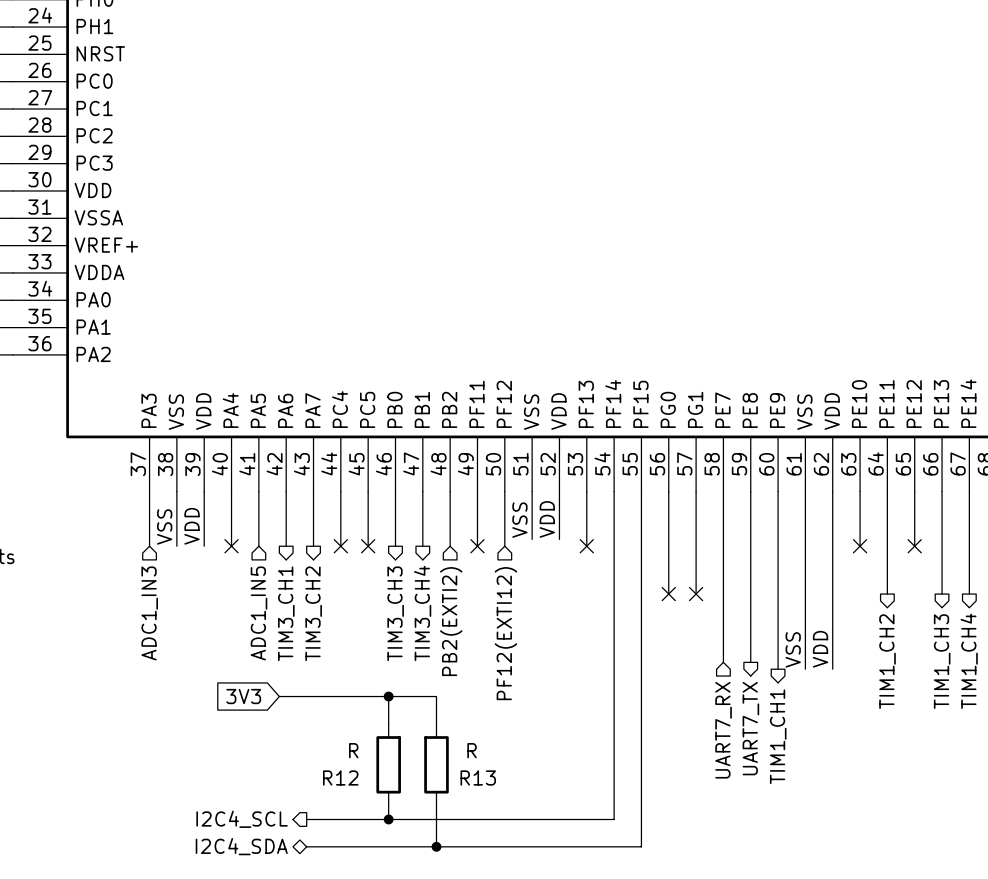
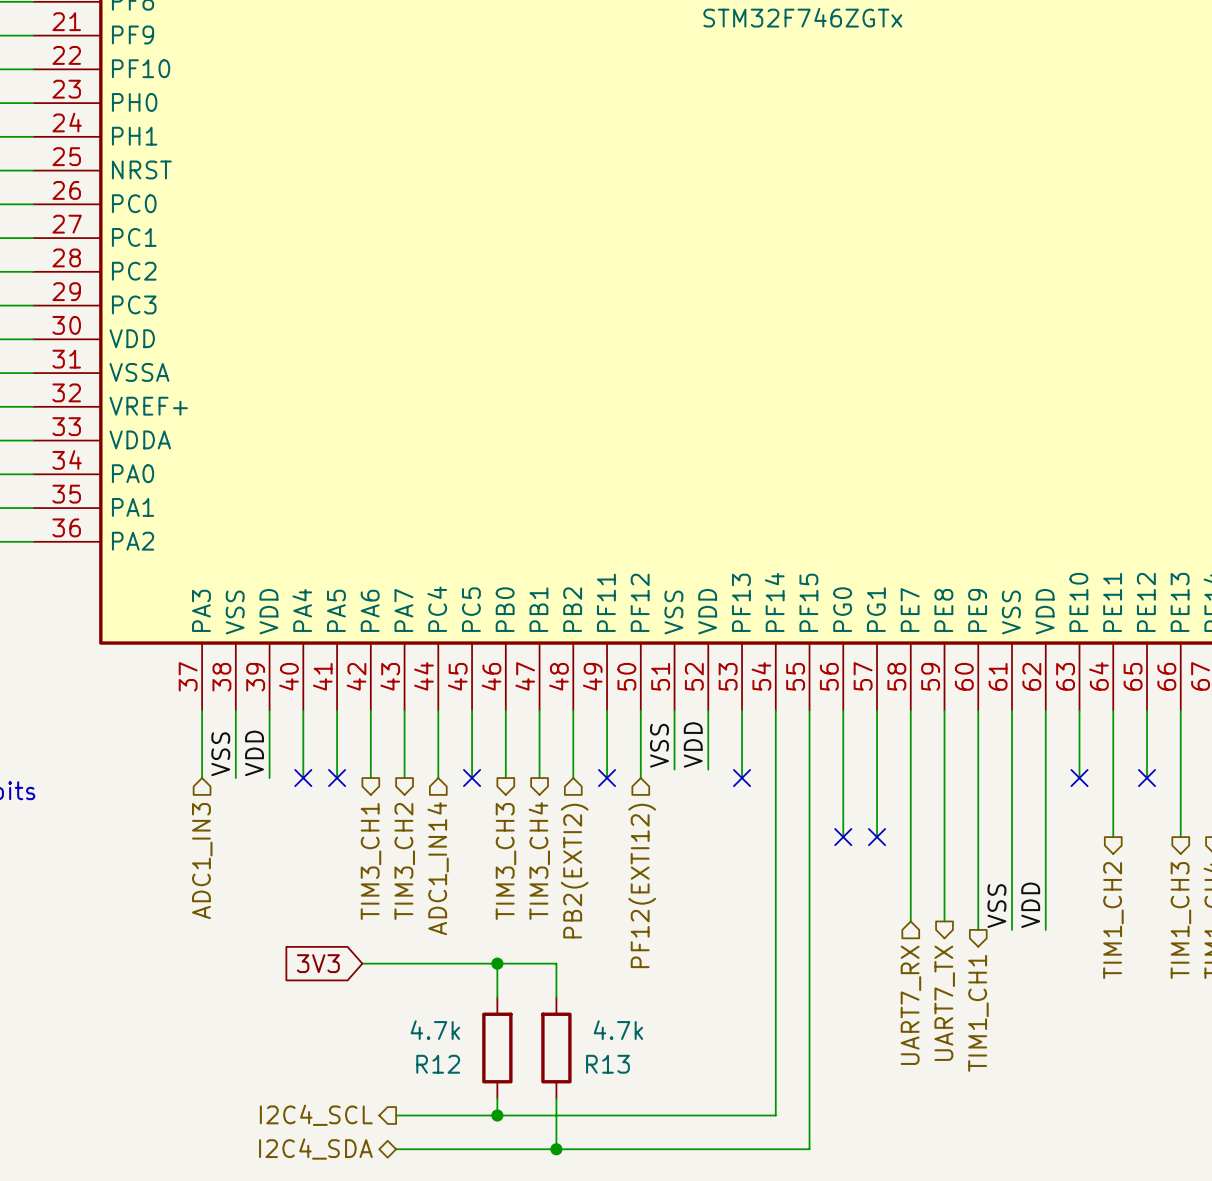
no-connect mark: none -> (337, 778)
no-connect mark: (340, 546) -> none
hierarchical label: ADC1_IN5 (259, 613) -> none
hierarchical label: none -> ADC1_IN14 (438, 868)
R12 value: R (353, 750) -> 4.7k (435, 1030)
R13 value: R (472, 750) -> 4.7k (618, 1030)

